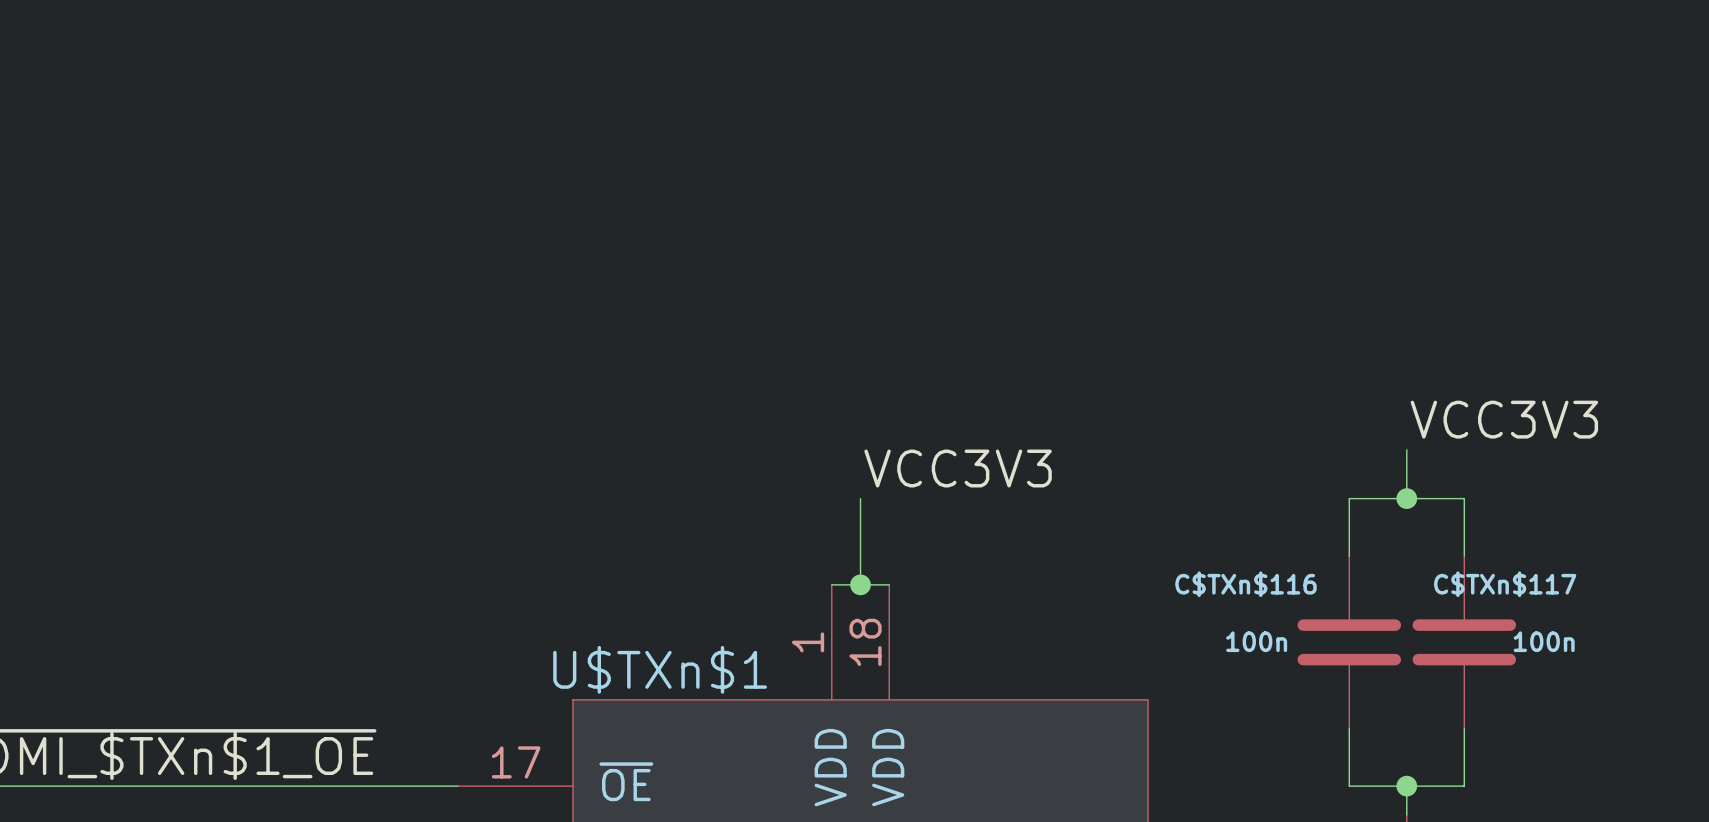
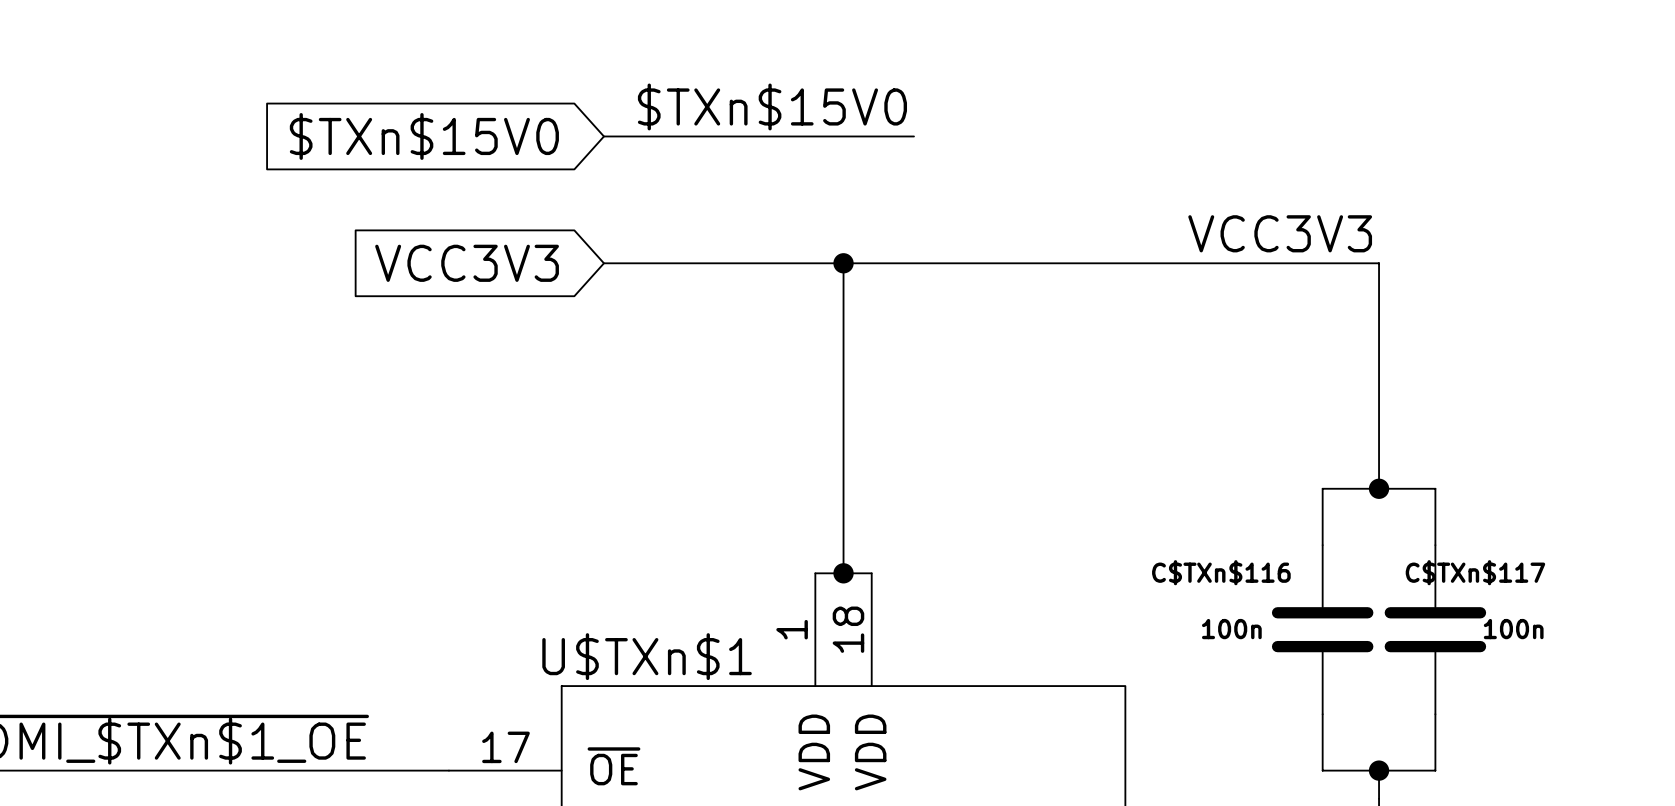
label: none -> $TXn$15V0 (772, 106)
global label: none -> $TXn$15V0 (424, 136)
wire: none -> (603, 136) (913, 136)
global label: none -> VCC3V3 (467, 263)
wire: none -> (603, 263) (1379, 263) (1379, 440)
wire: none -> (843, 263) (843, 488)
junction: none -> (843, 263)
label position: VCC3V3 (1504, 419) -> VCC3V3 (1280, 233)
label: VCC3V3 (958, 468) -> none

